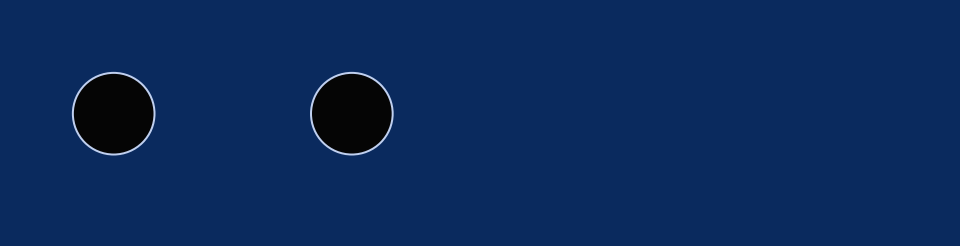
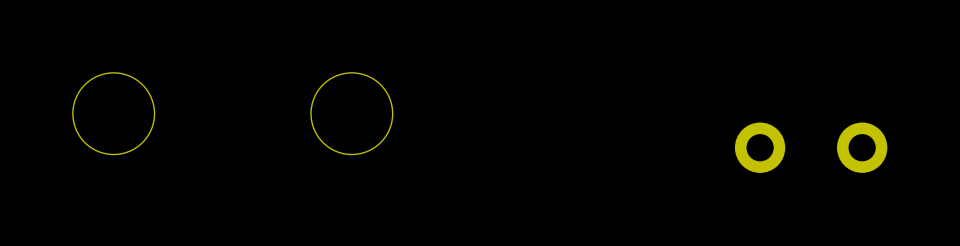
part: none -> (760, 147)
part: none -> (862, 147)

